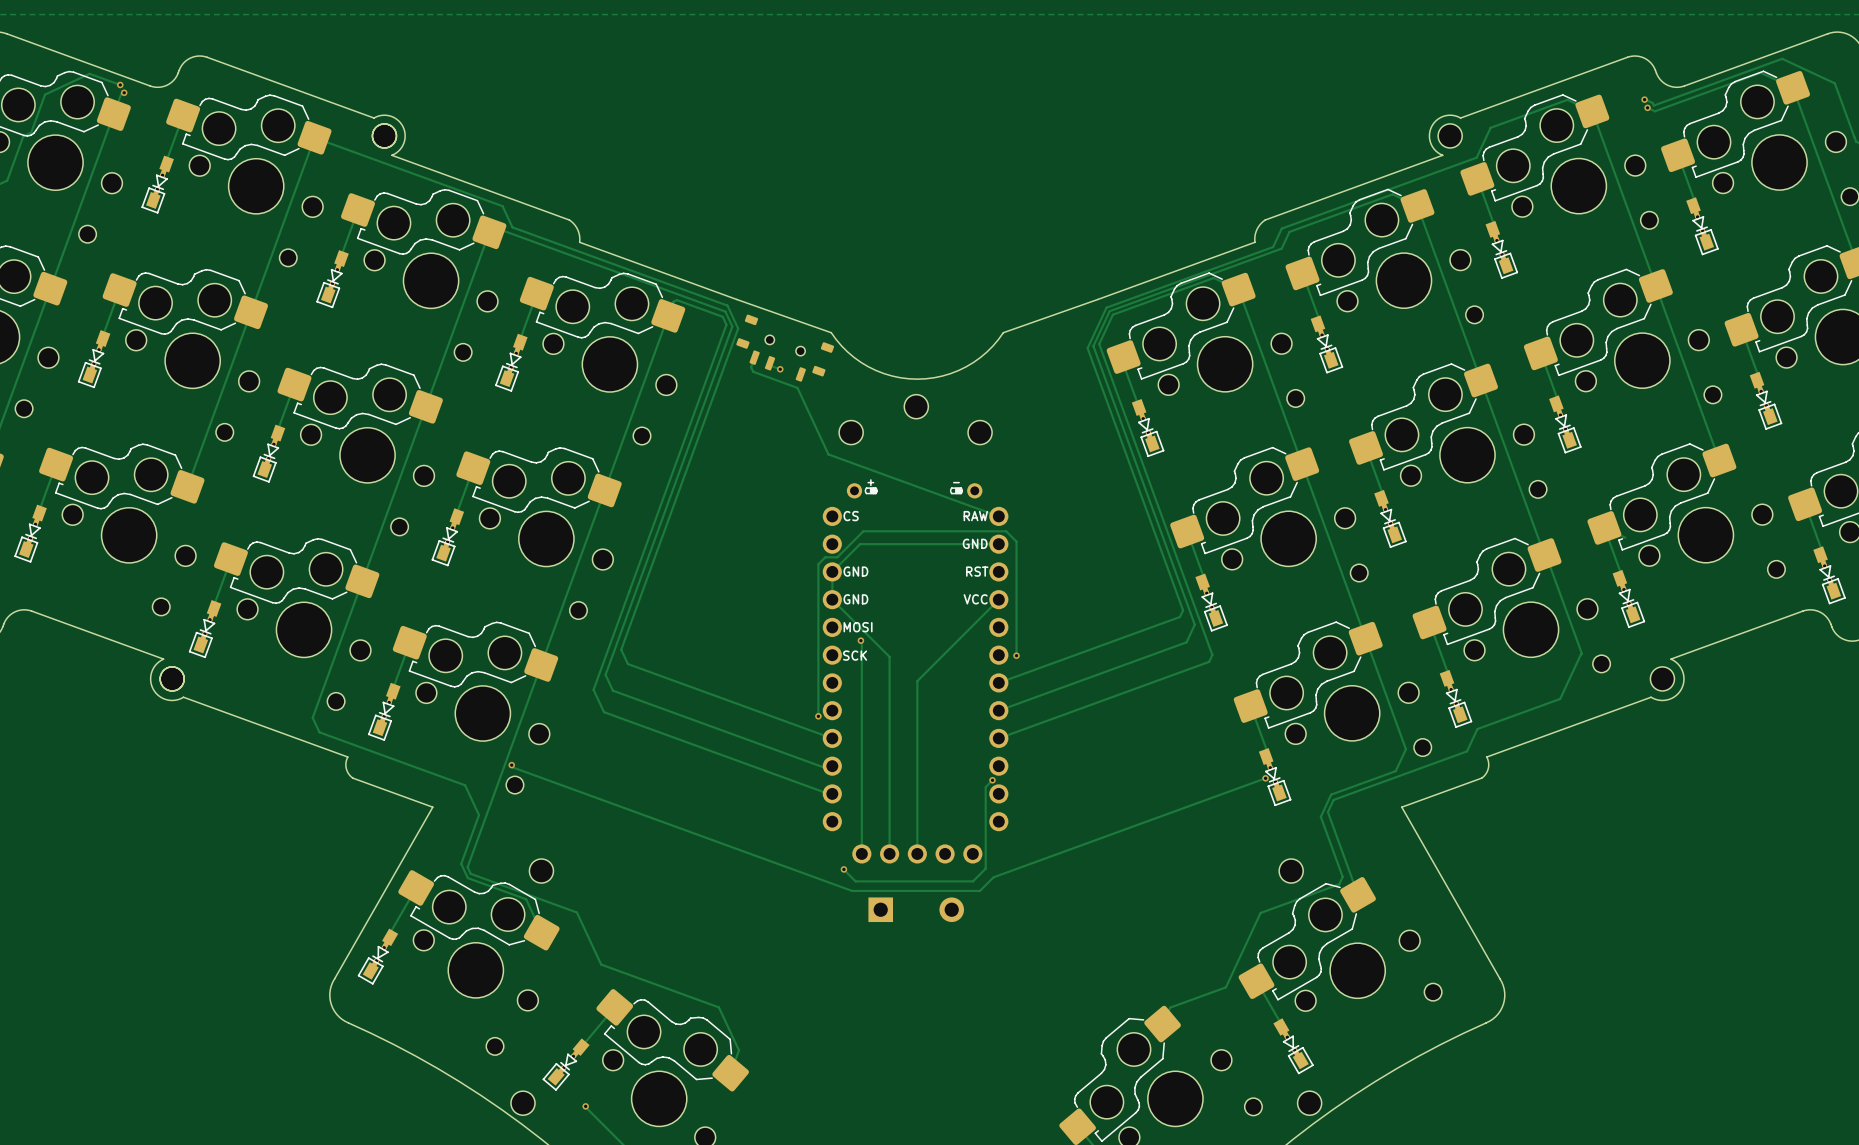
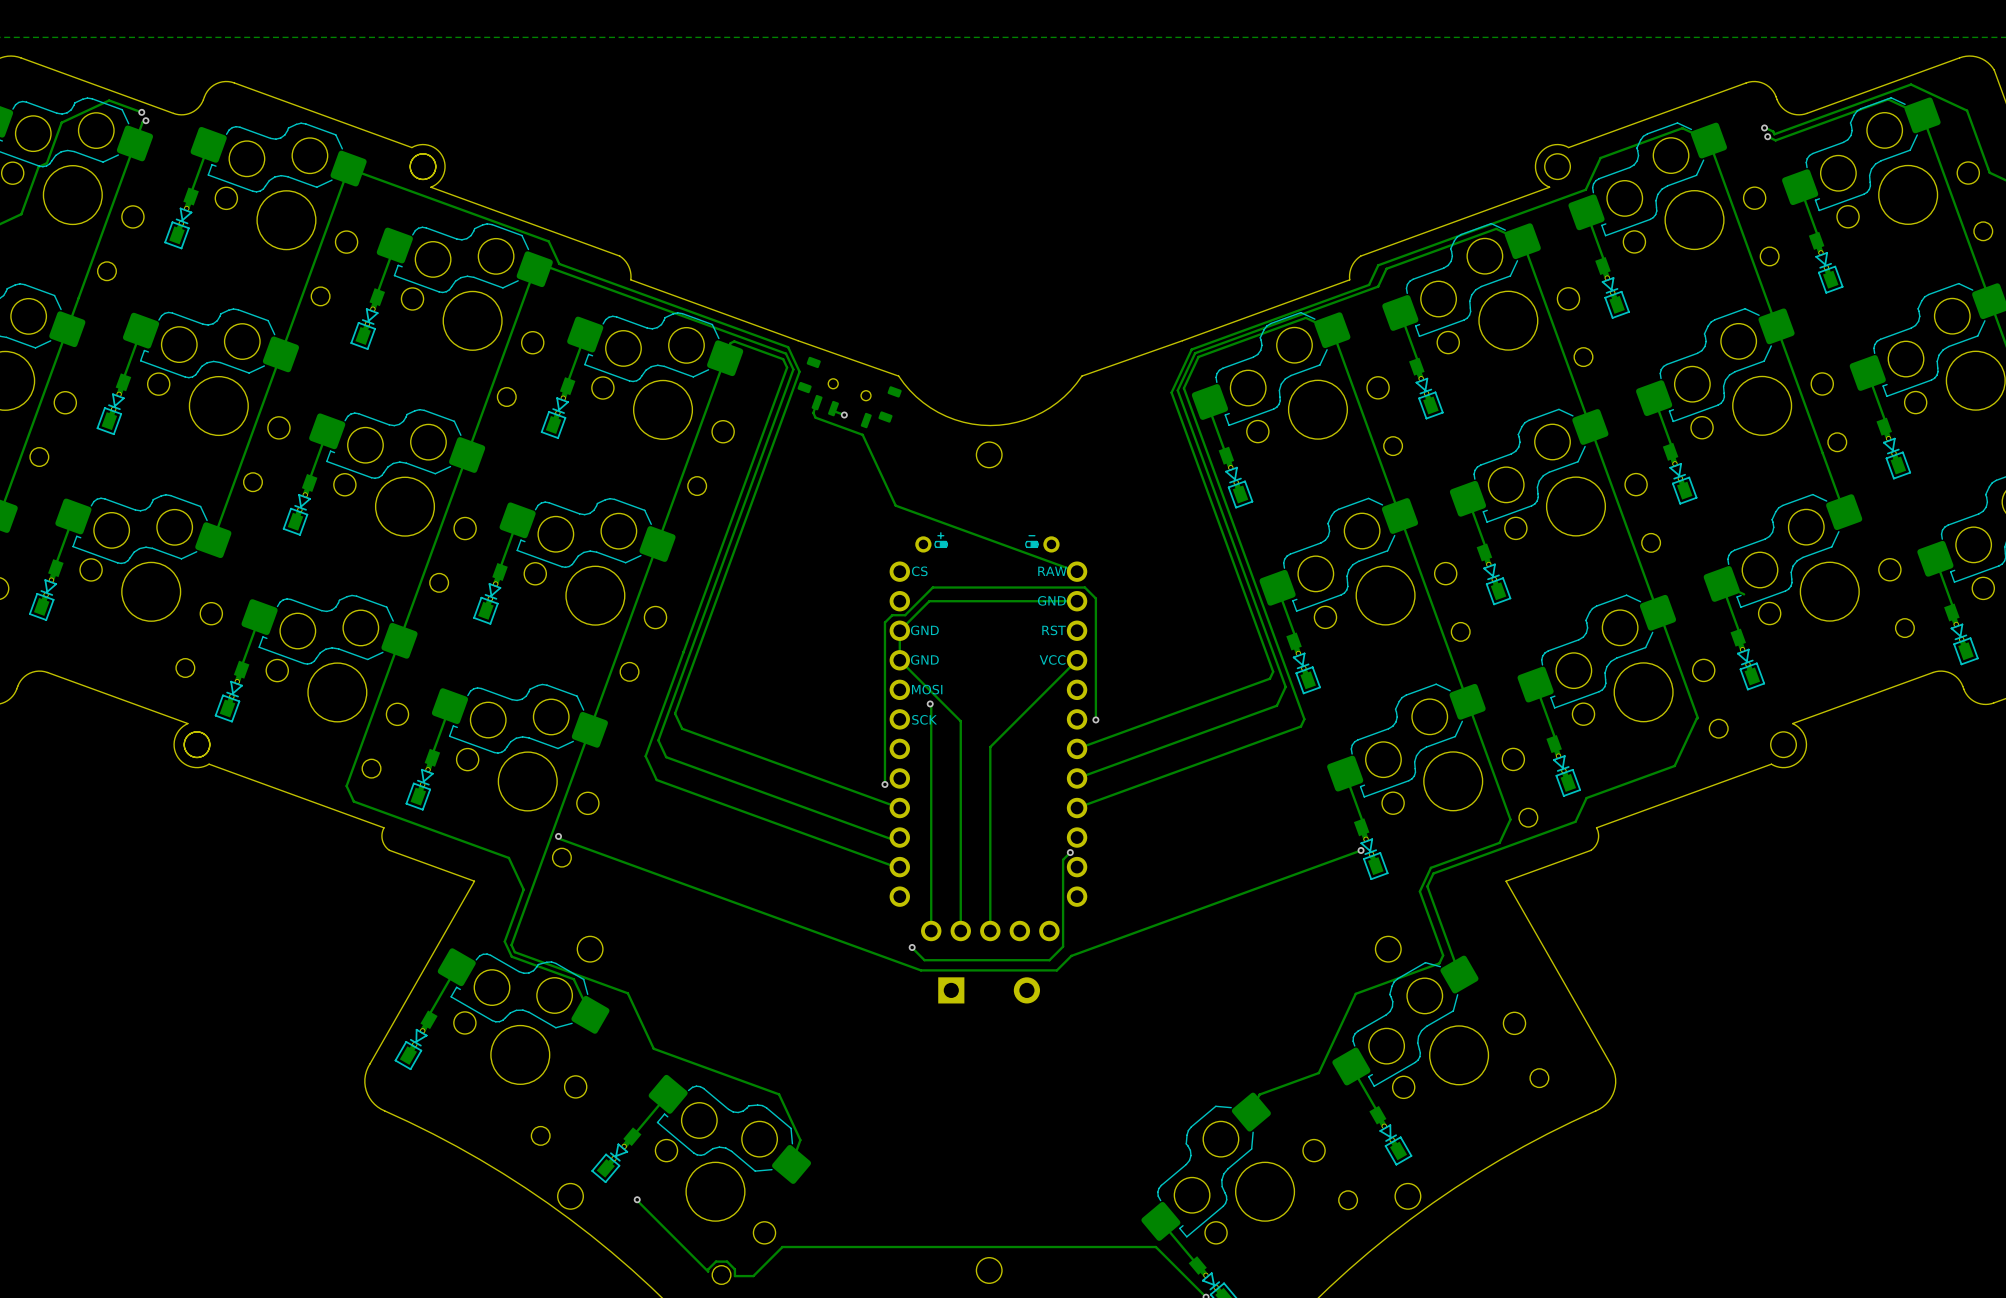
part: (851, 432) -> none
part: (980, 432) -> none

